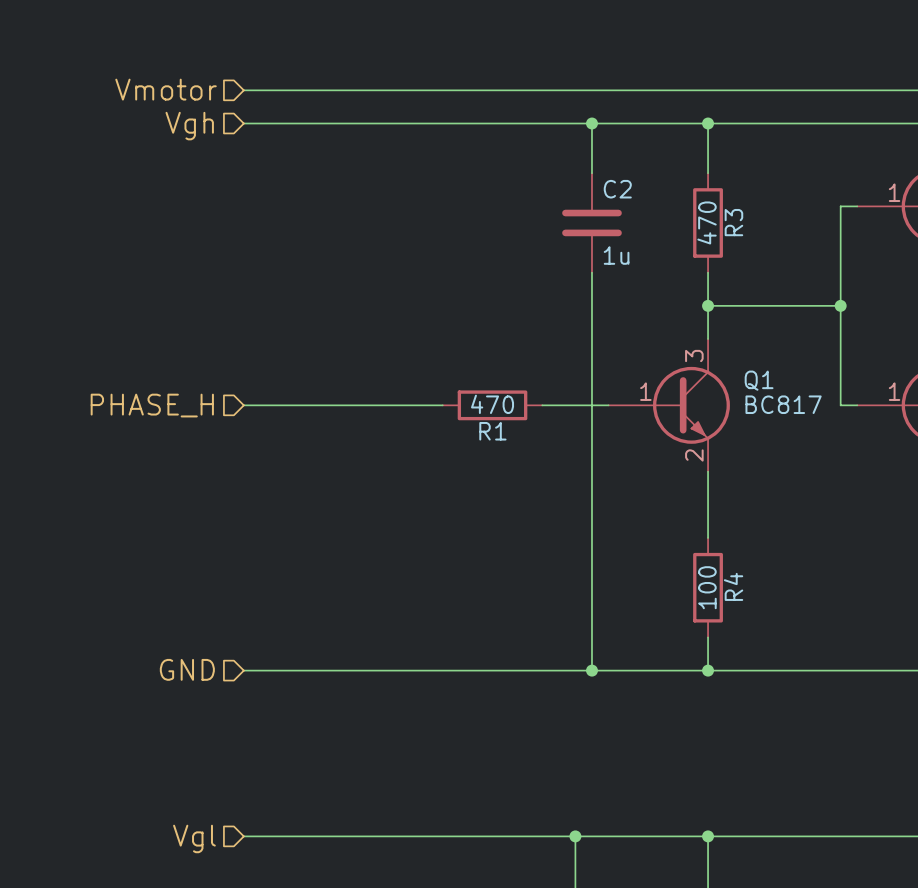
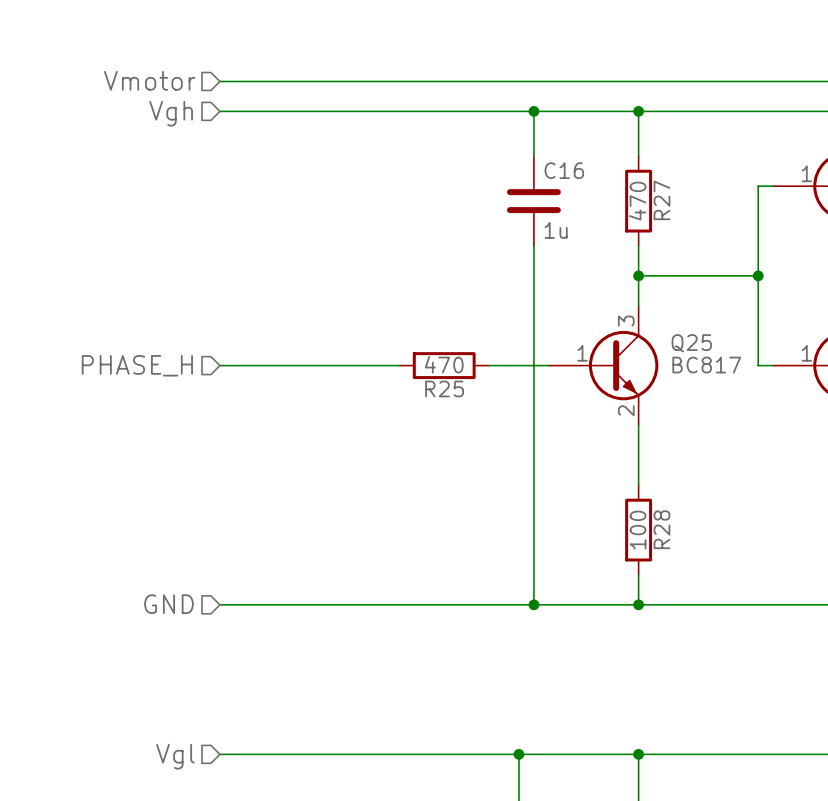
C2 name: C2 (617, 189) -> C16 (564, 170)
R3 name: R3 (733, 222) -> R27 (661, 200)
Q1 name: Q1 (759, 380) -> Q25 (691, 343)
R1 name: R1 (492, 431) -> R25 (444, 388)
R4 name: R4 (733, 586) -> R28 (661, 529)

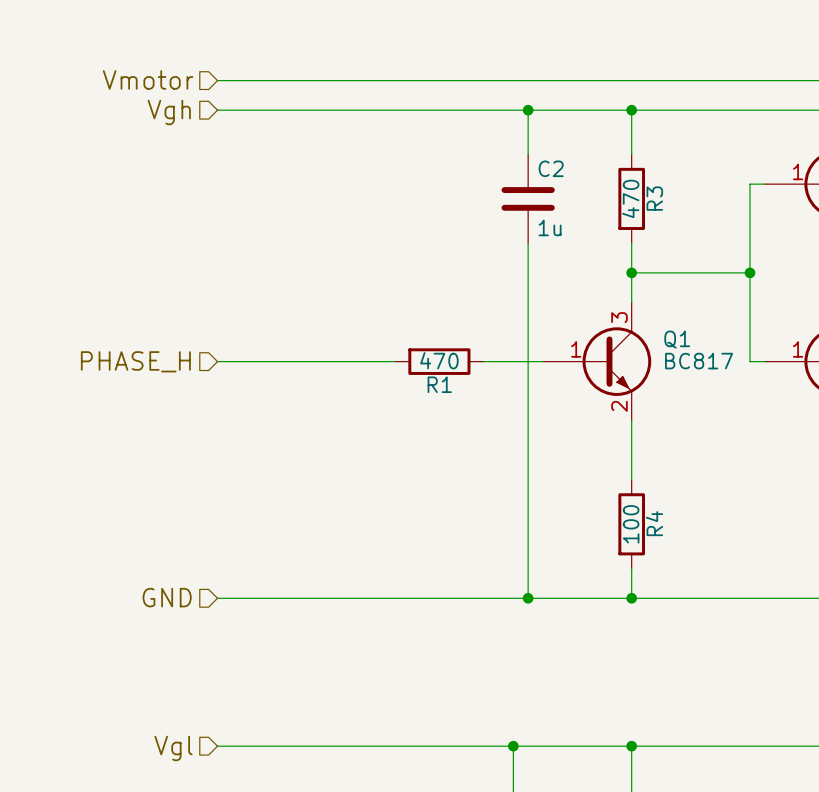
C16 name: C16 (564, 170) -> C2 (551, 168)
R27 name: R27 (661, 200) -> R3 (654, 198)
Q25 name: Q25 (691, 343) -> Q1 (677, 339)
R25 name: R25 (444, 388) -> R1 (439, 384)
R28 name: R28 (661, 529) -> R4 (654, 523)

